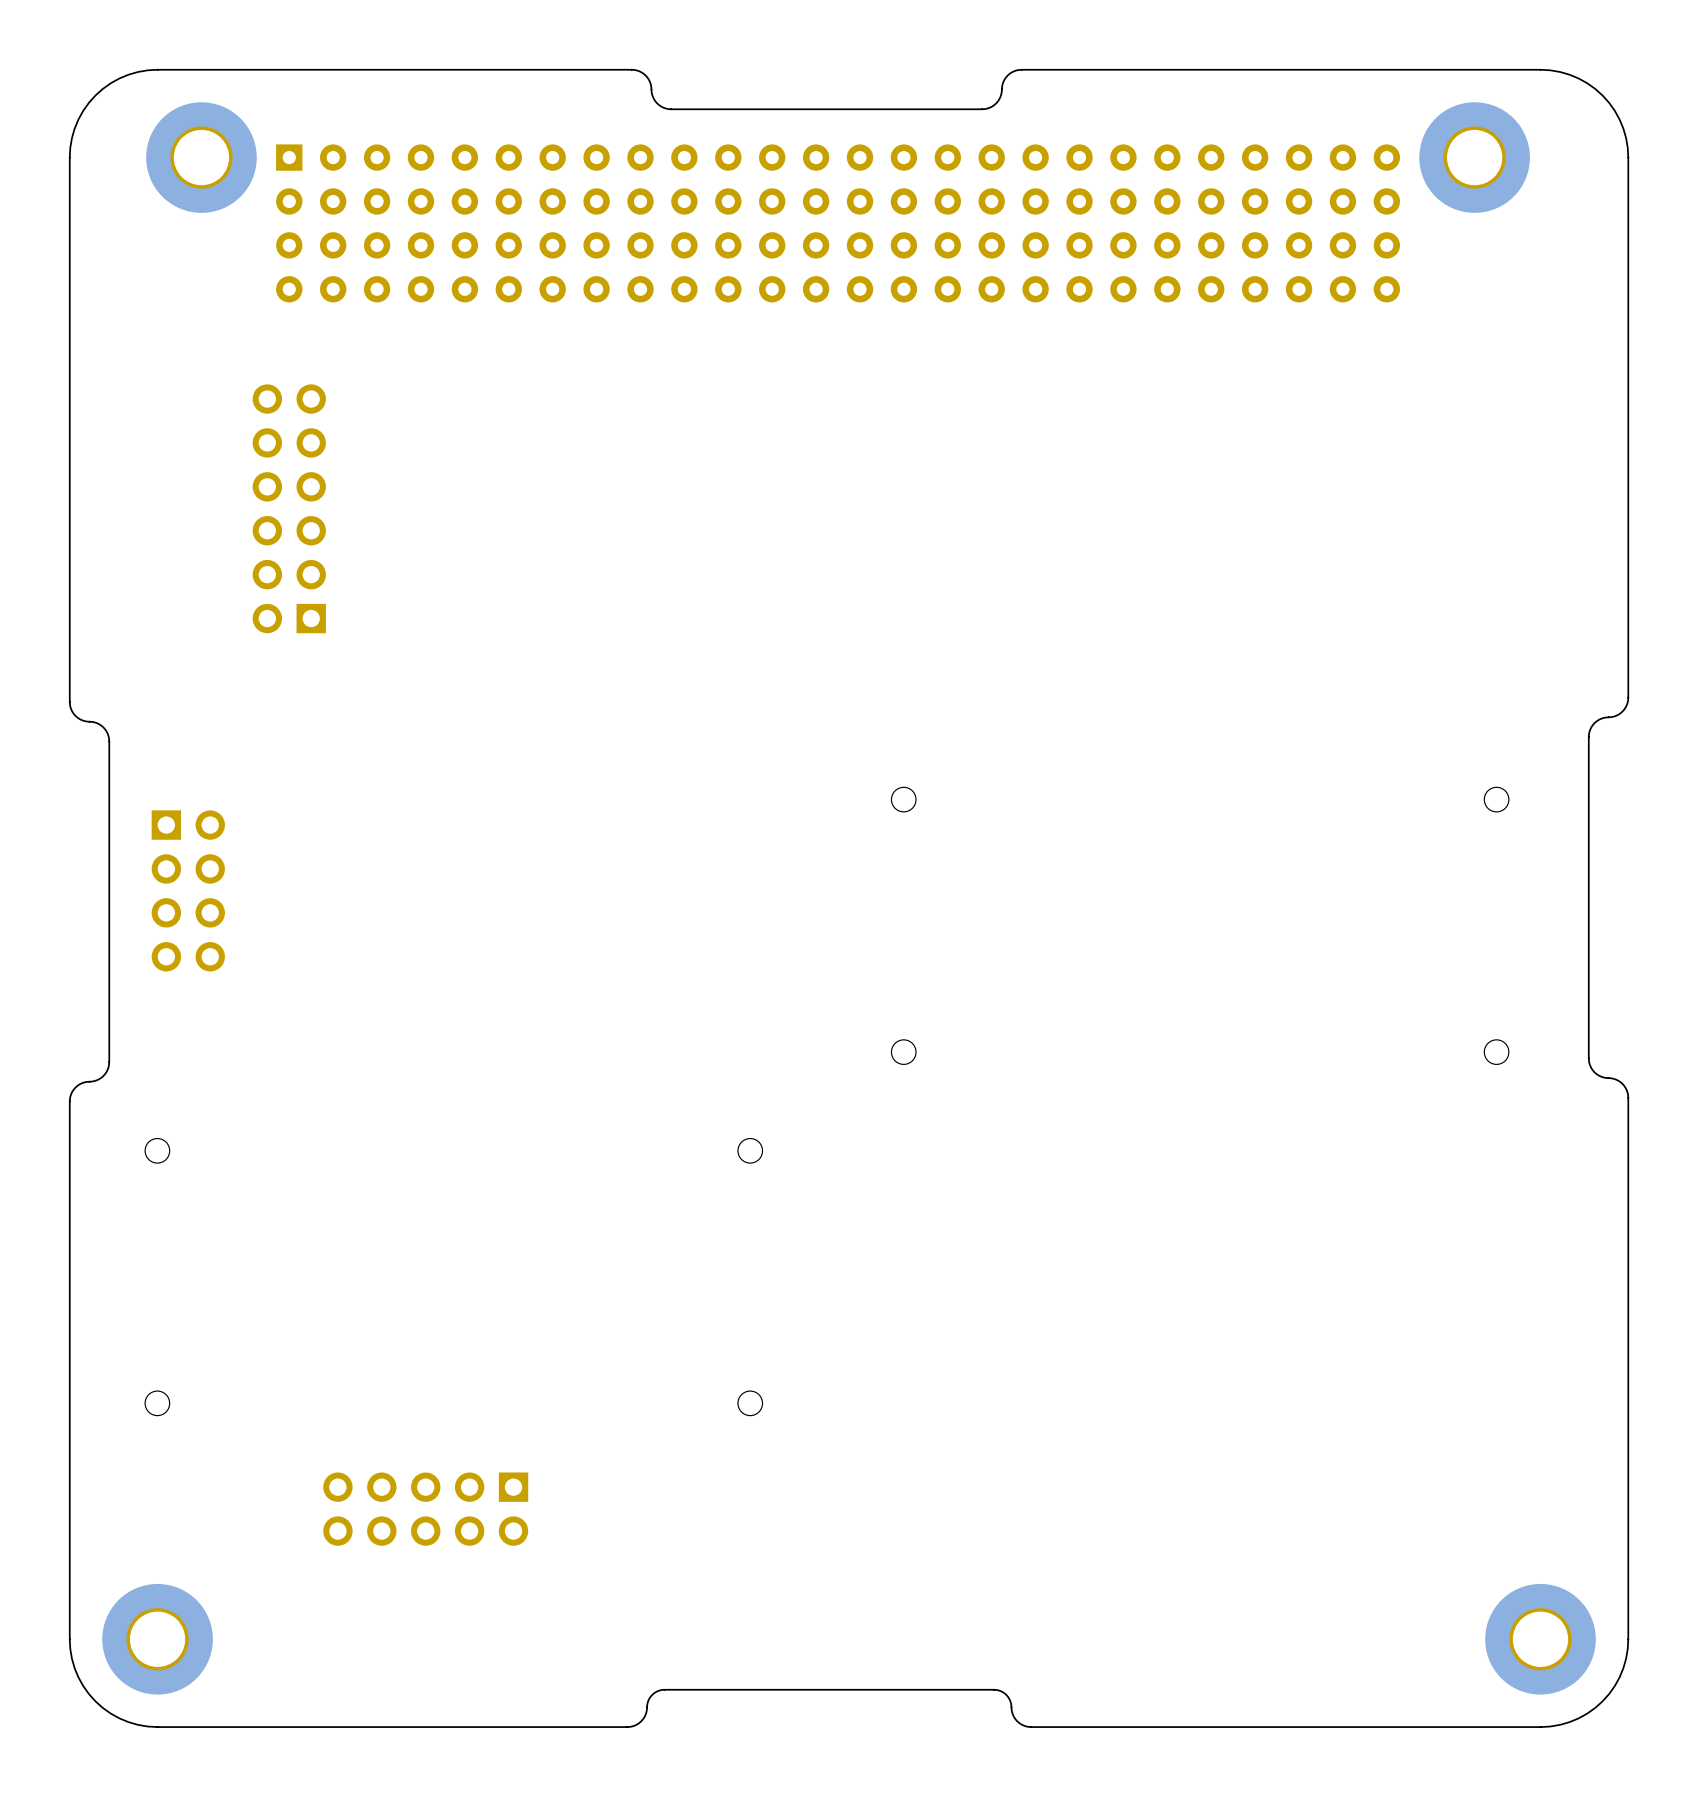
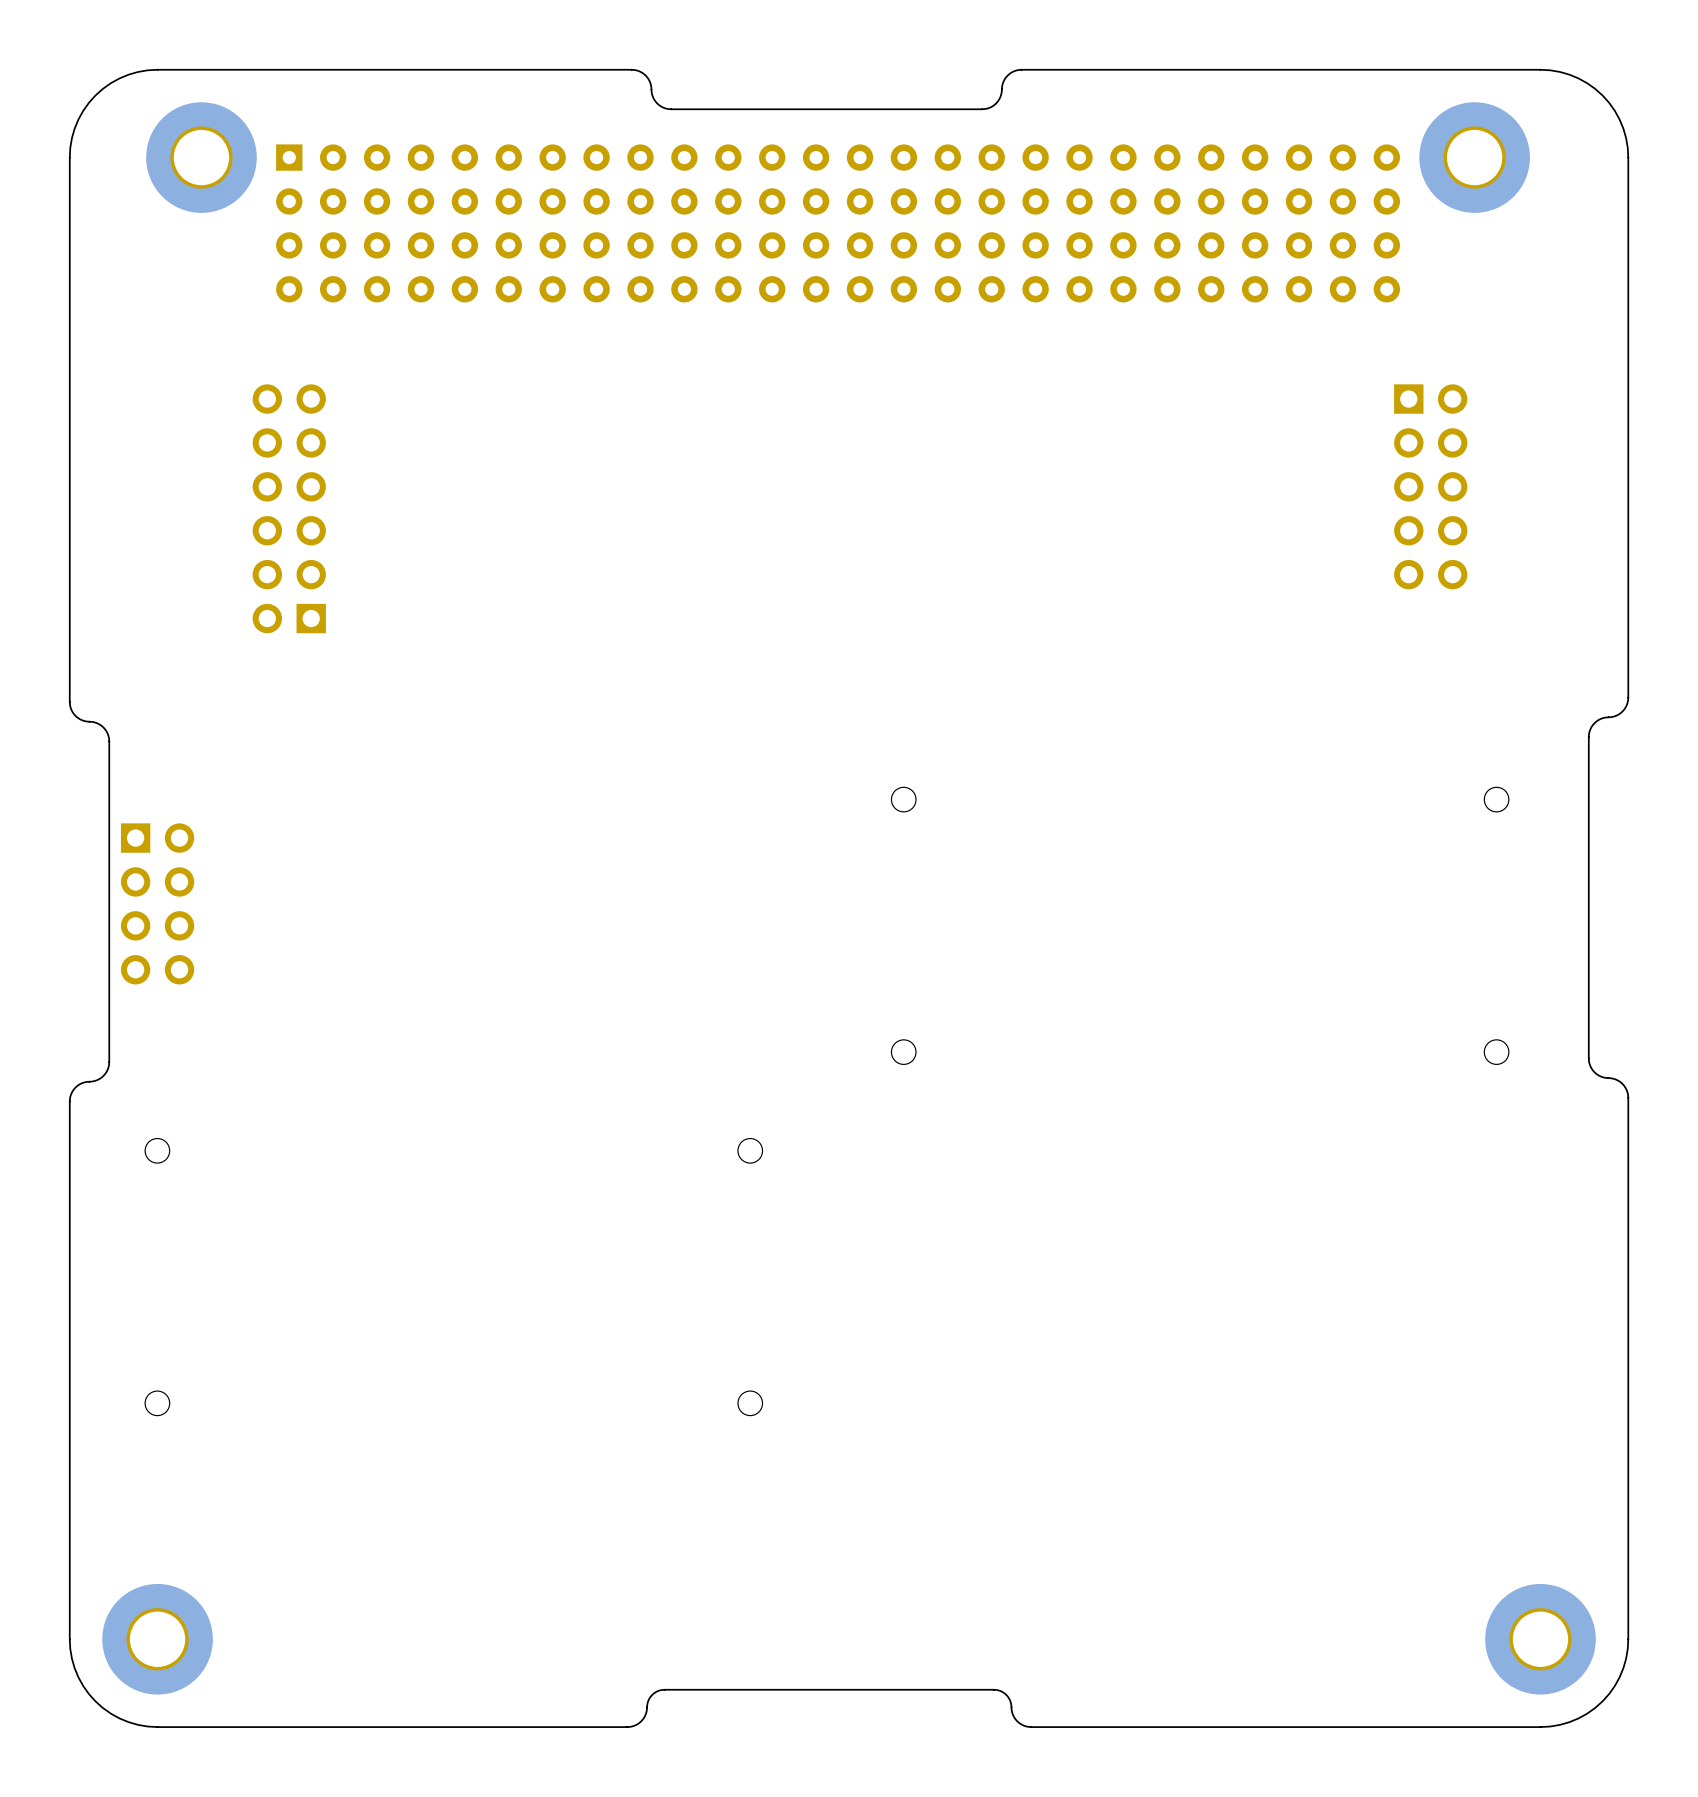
part: none -> (1430, 486)
part position: (188, 890) -> (157, 903)
part: (425, 1509) -> none

